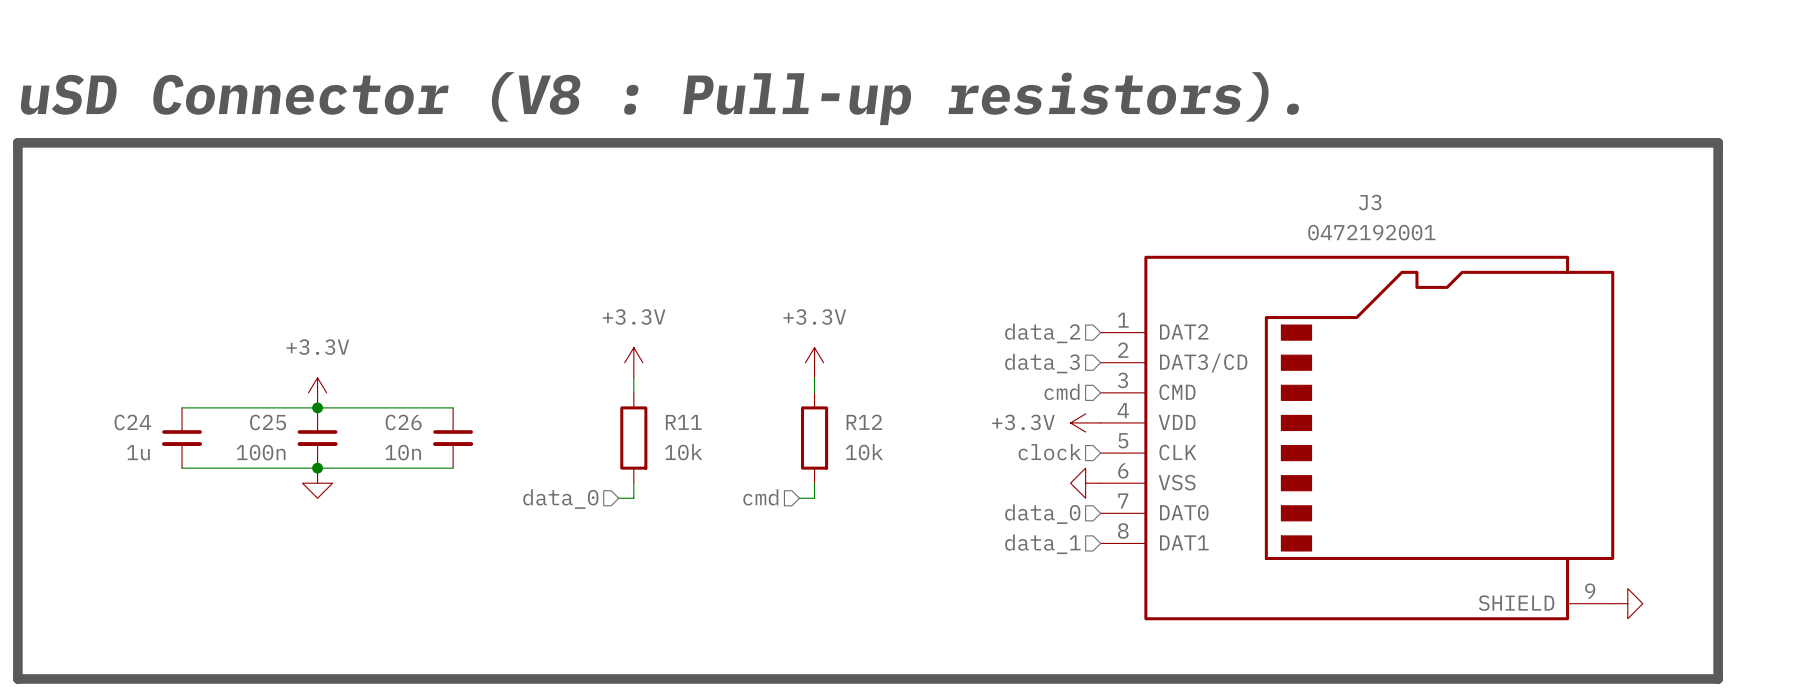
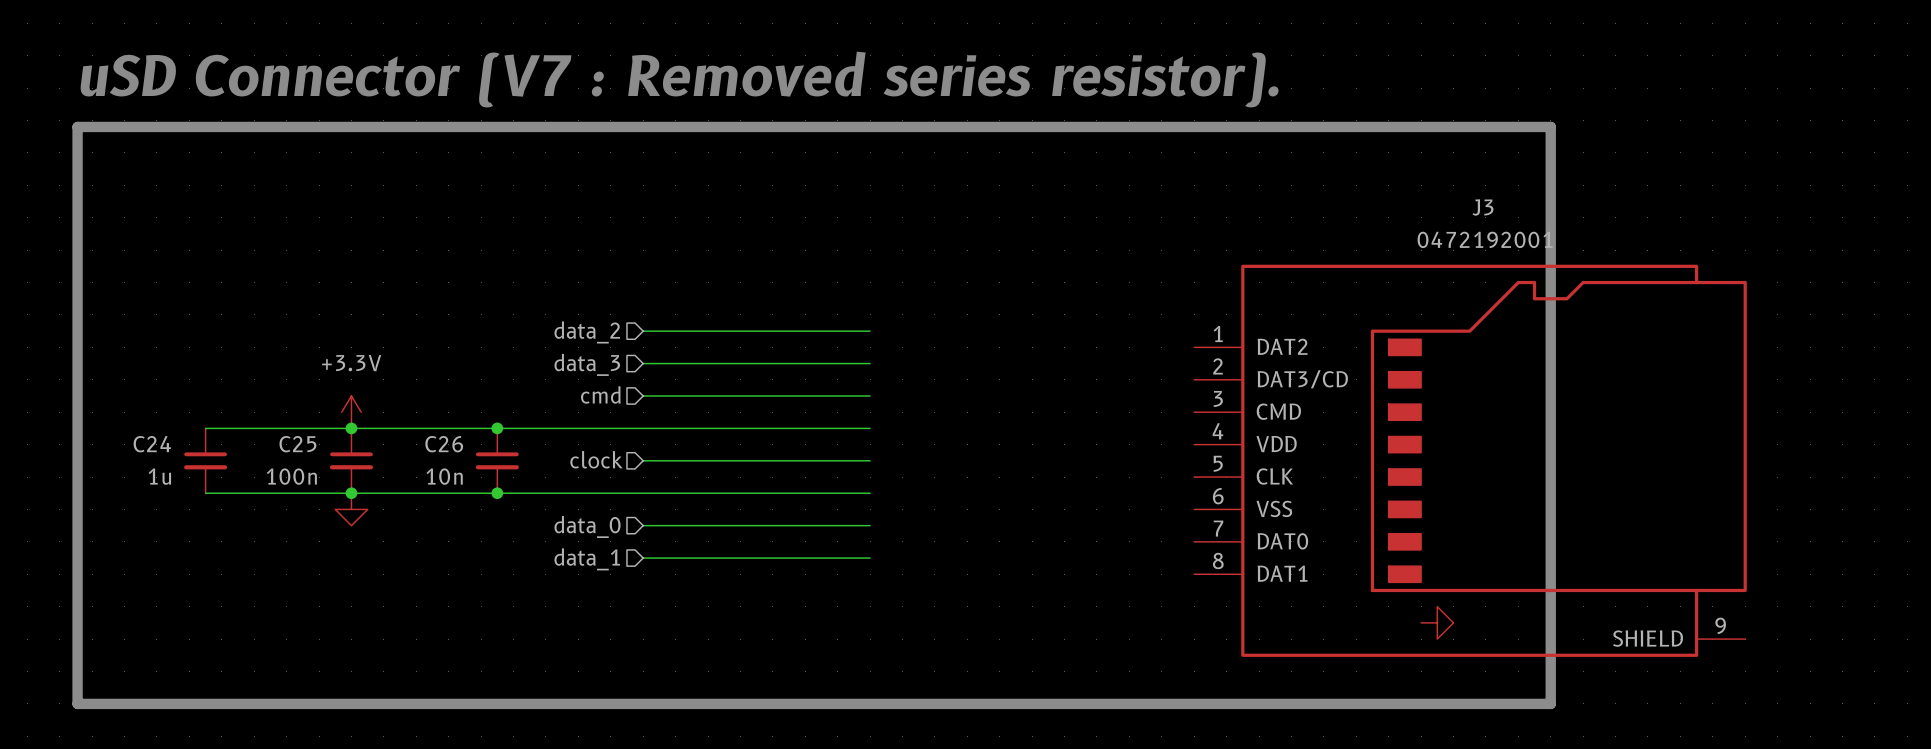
text: uSD Connector (V8 : Pull-up resistors). (659, 98) -> uSD Connector (V7 : Removed series resistor). (679, 79)
line: (17, 142) (1718, 142) (1718, 678) (17, 678) (17, 142) -> (77, 126) (77, 703) (1550, 703) (1550, 126) (77, 126)
wire: none -> (643, 331) (870, 331)
hierarchical label: none -> data_2 (587, 332)
hierarchical label: data_2 (1042, 333) -> none
wire: none -> (643, 363) (870, 363)
hierarchical label: none -> data_3 (587, 364)
power symbol: +3.3V (633, 362) -> none
power symbol: +3.3V (814, 362) -> none
hierarchical label: data_3 (1042, 363) -> none
wire: none -> (643, 395) (870, 395)
wire: (633, 377) (633, 392) -> none
wire: (814, 377) (814, 392) -> none
hierarchical label: cmd (1062, 391) -> none
wire: none -> (497, 428) (870, 428)
junction: none -> (497, 428)
power symbol: +3.3V (1085, 422) -> none
hierarchical label: none -> clock (596, 459)
wire: none -> (643, 460) (870, 460)
R11: 10k (633, 438) -> none
R12: 10k (814, 438) -> none
hierarchical label: clock (1049, 452) -> none
wire: none -> (497, 493) (870, 493)
junction: none -> (497, 493)
wire: (633, 483) (633, 498) -> (870, 525) (691, 525)
wire: (814, 483) (814, 498) (799, 498) -> none
power symbol: (1085, 483) -> none
hierarchical label position: cmd (760, 497) -> cmd (600, 394)
wire: none -> (643, 525) (675, 525)
hierarchical label position: data_0 (560, 499) -> data_0 (587, 526)
hierarchical label: data_0 (1042, 514) -> none
wire: none -> (643, 558) (870, 558)
hierarchical label: none -> data_1 (587, 559)
hierarchical label: data_1 (1042, 544) -> none
power symbol: none -> (1437, 622)
power symbol: (1627, 603) -> none

